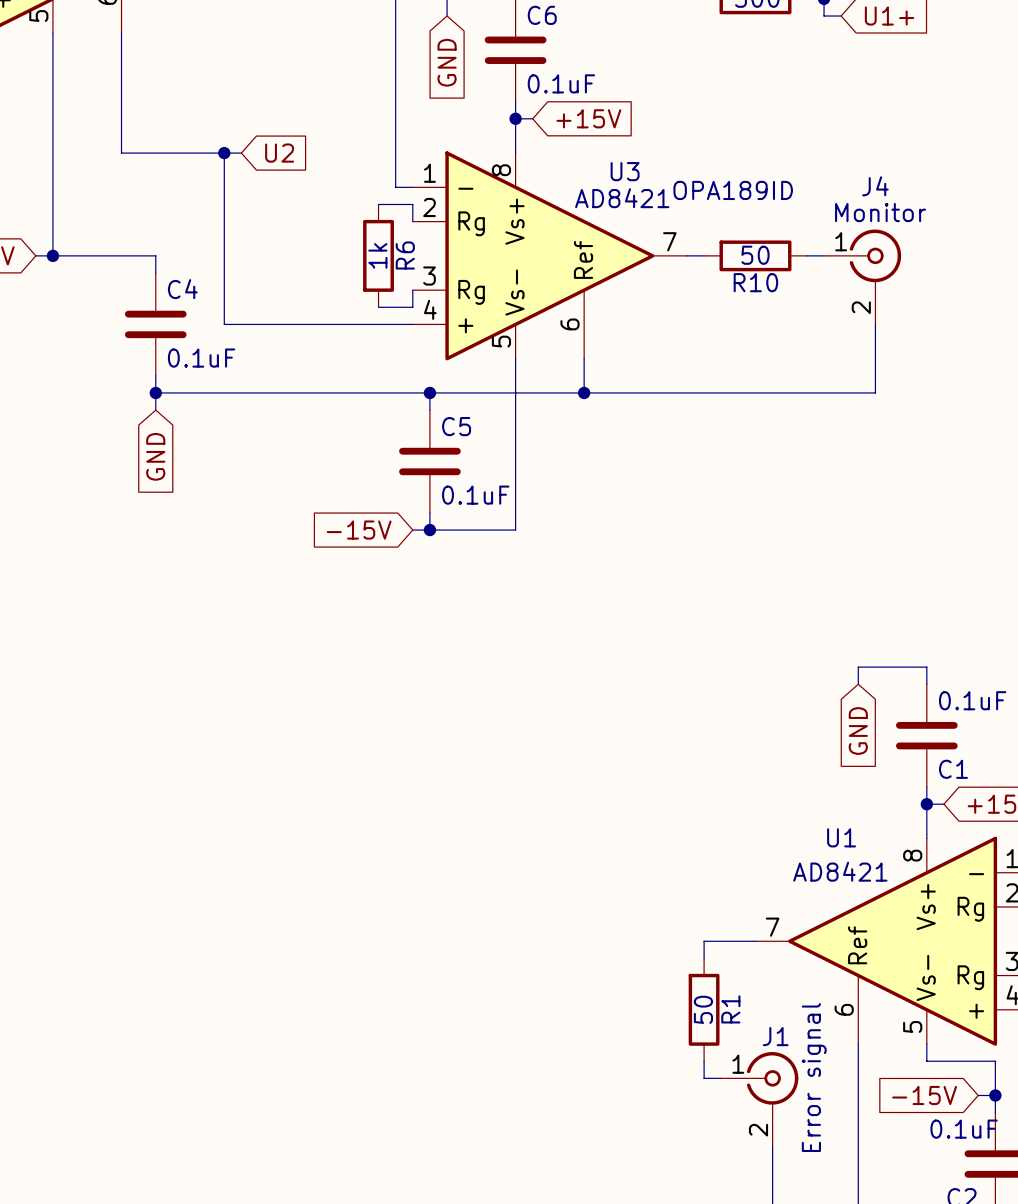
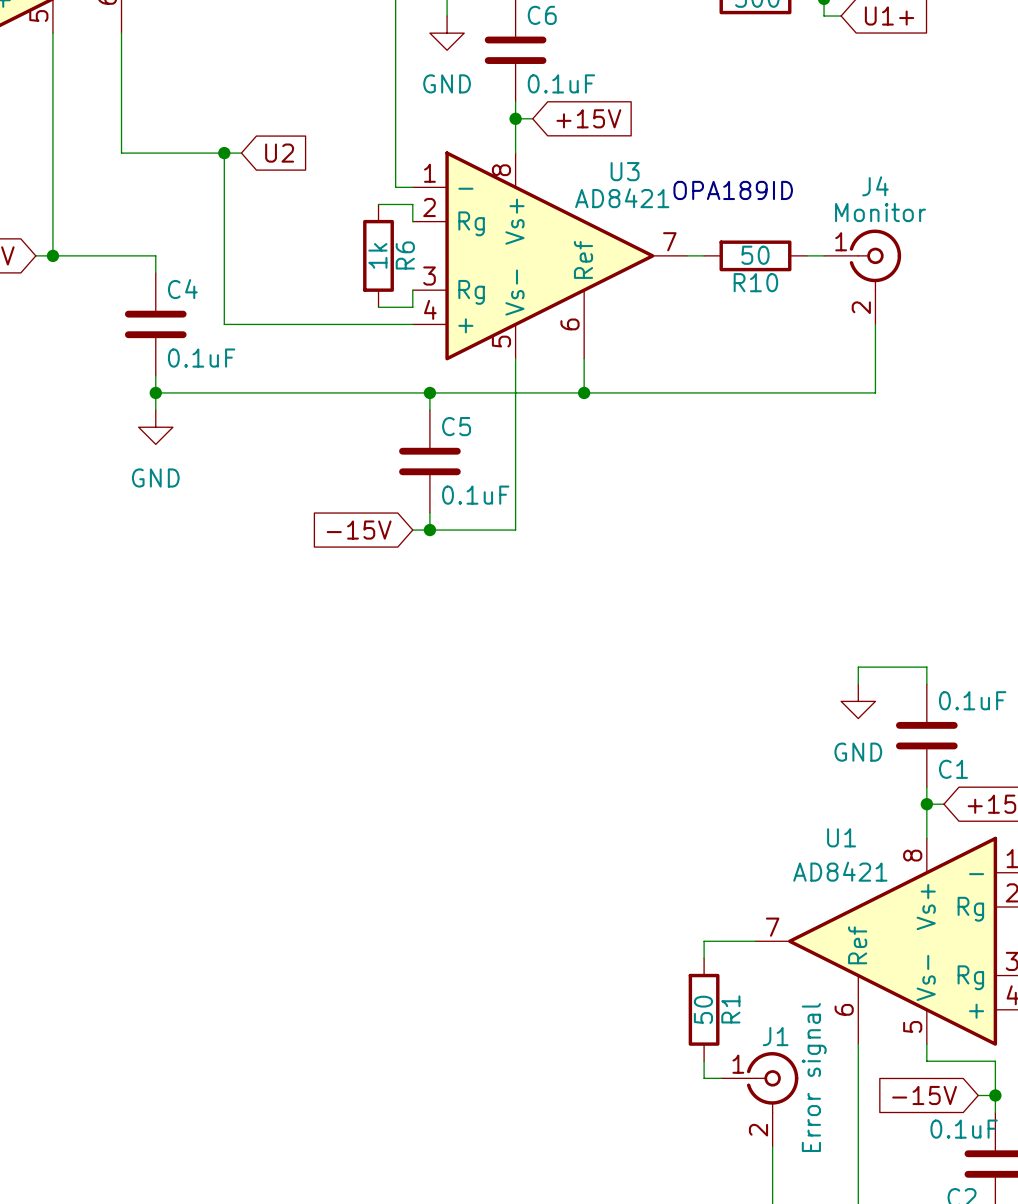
power symbol: none -> GND (447, 33)
global label: GND (447, 62) -> none
power symbol: none -> GND (155, 427)
global label: GND (155, 456) -> none
power symbol: none -> GND (858, 701)
global label: GND (858, 731) -> none

